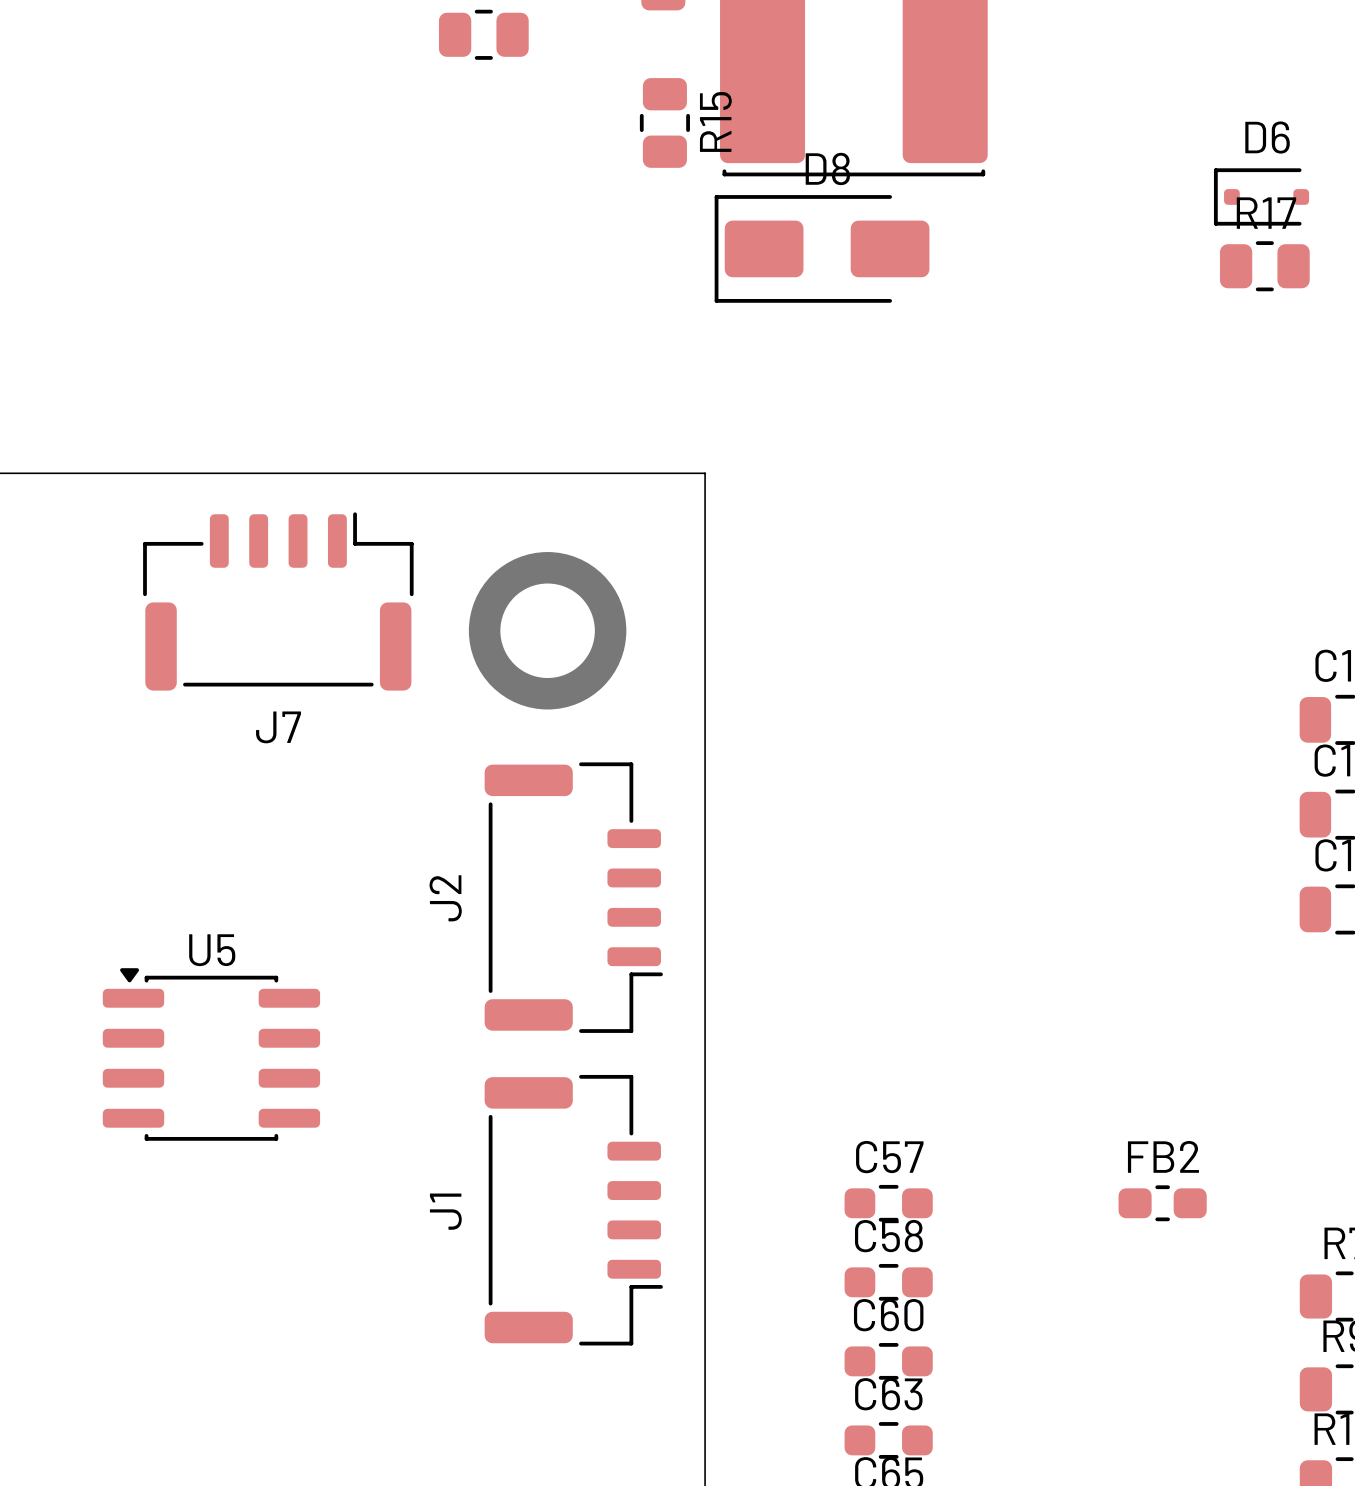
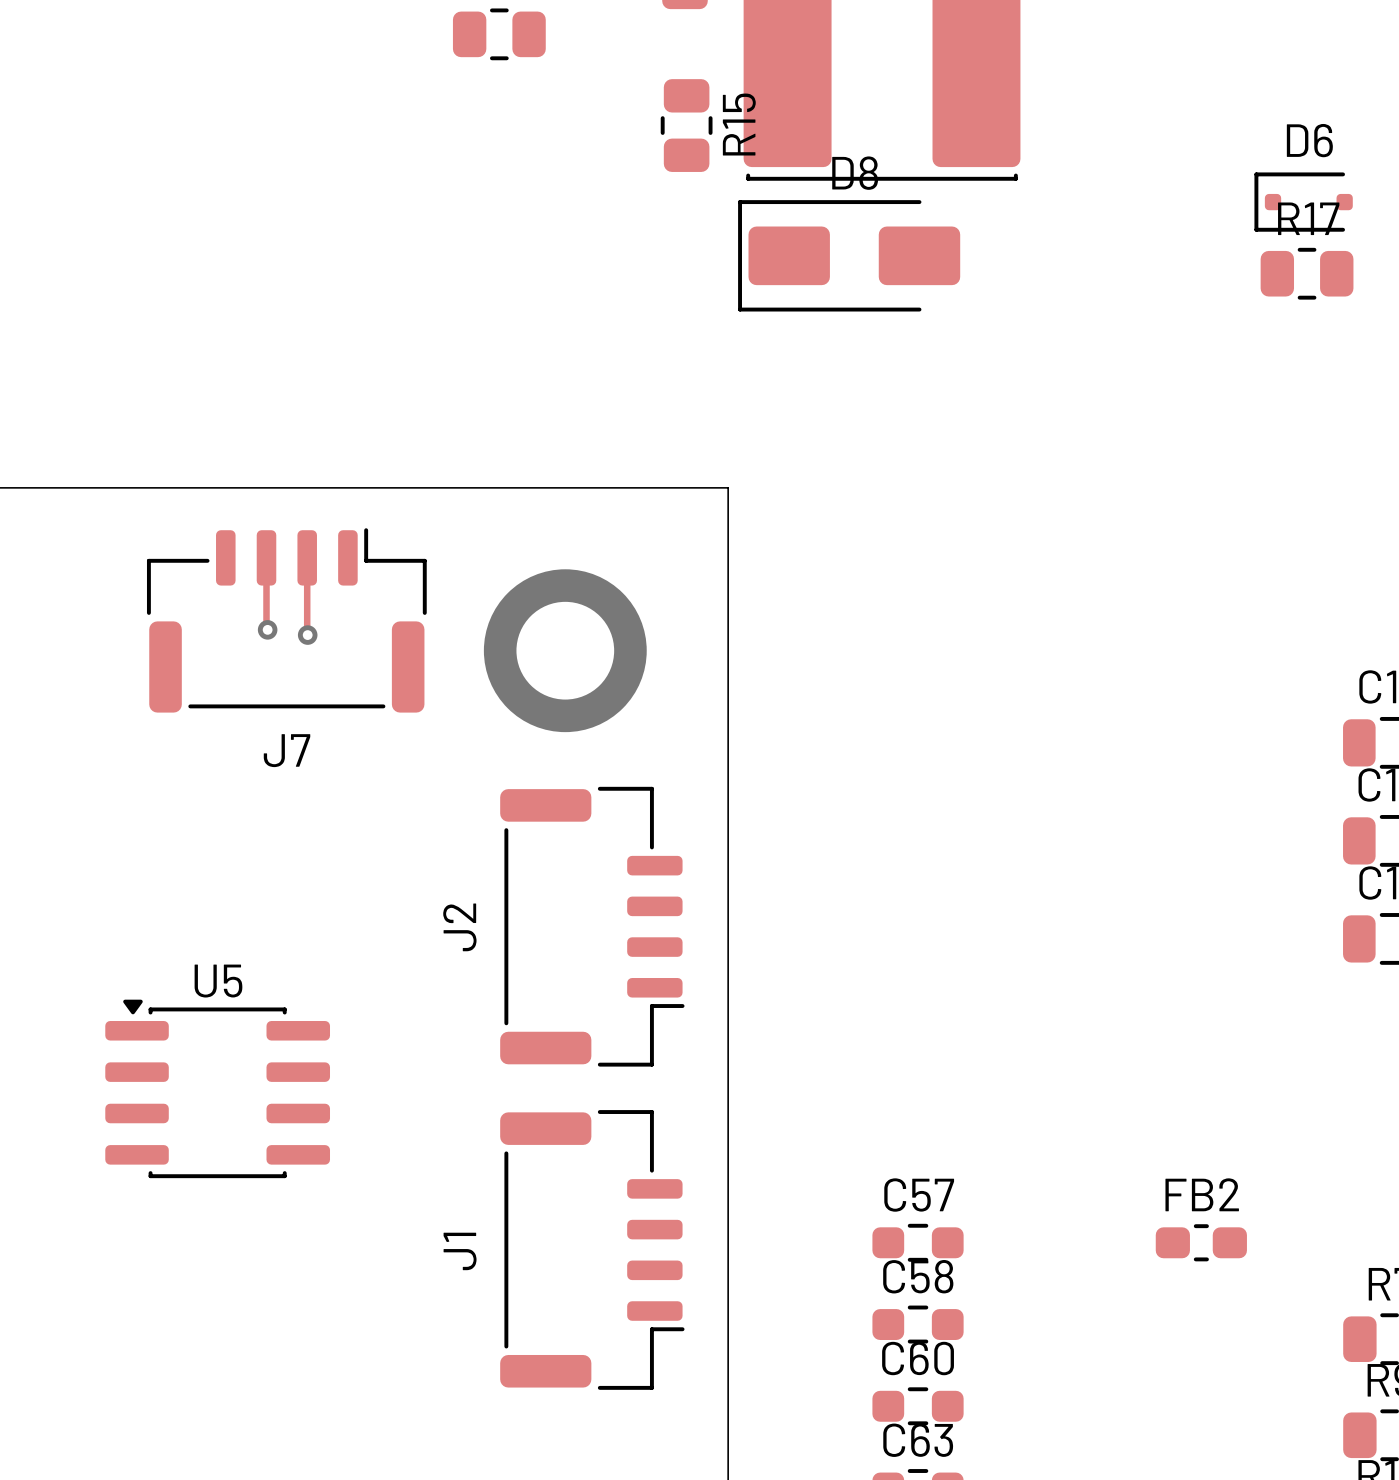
track: none -> (266, 557) (267, 629)
track: none -> (307, 557) (307, 635)
via: none -> (267, 629)
via: none -> (307, 635)

